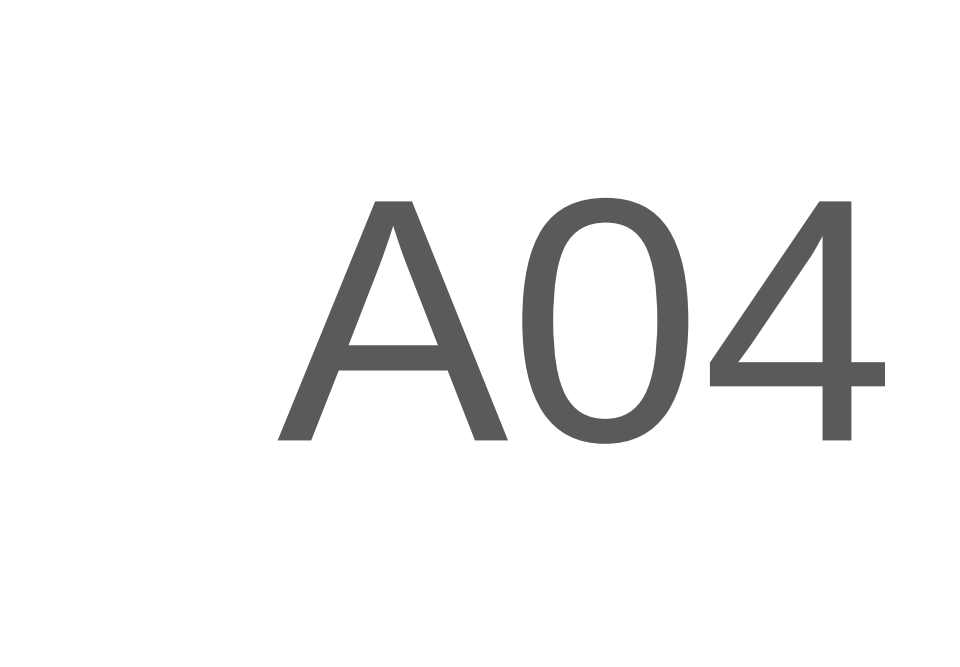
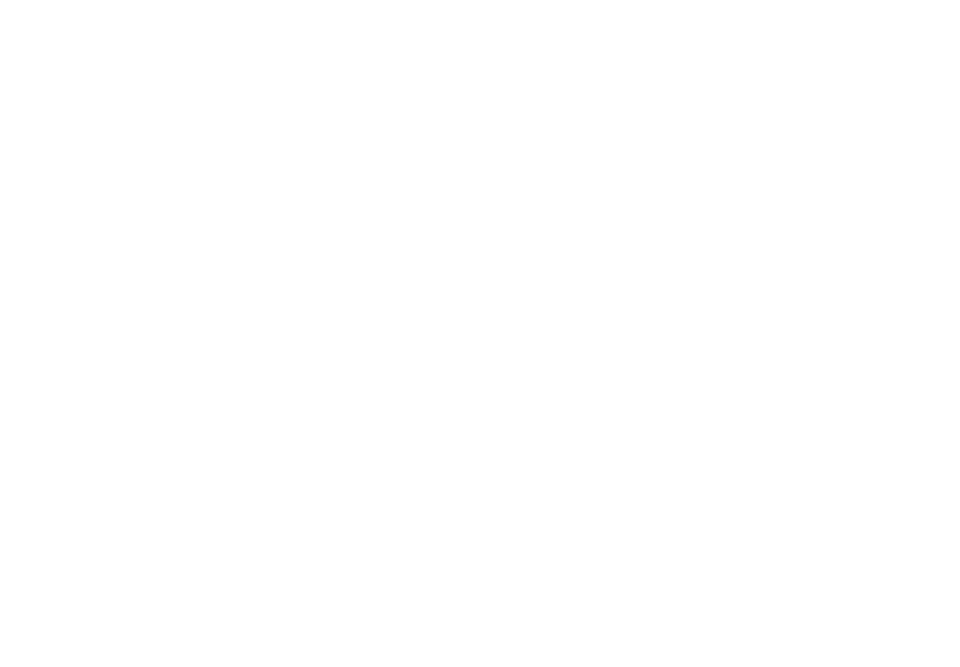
text: A04 (581, 320) -> none

